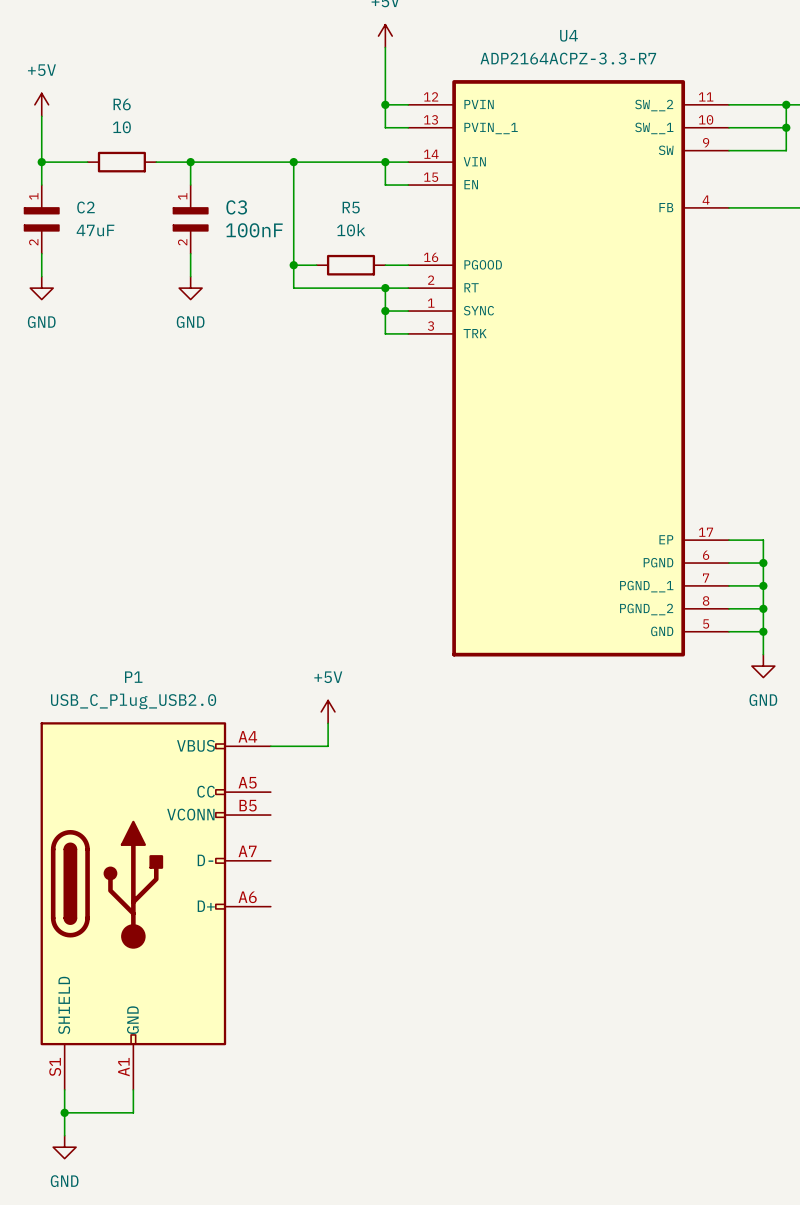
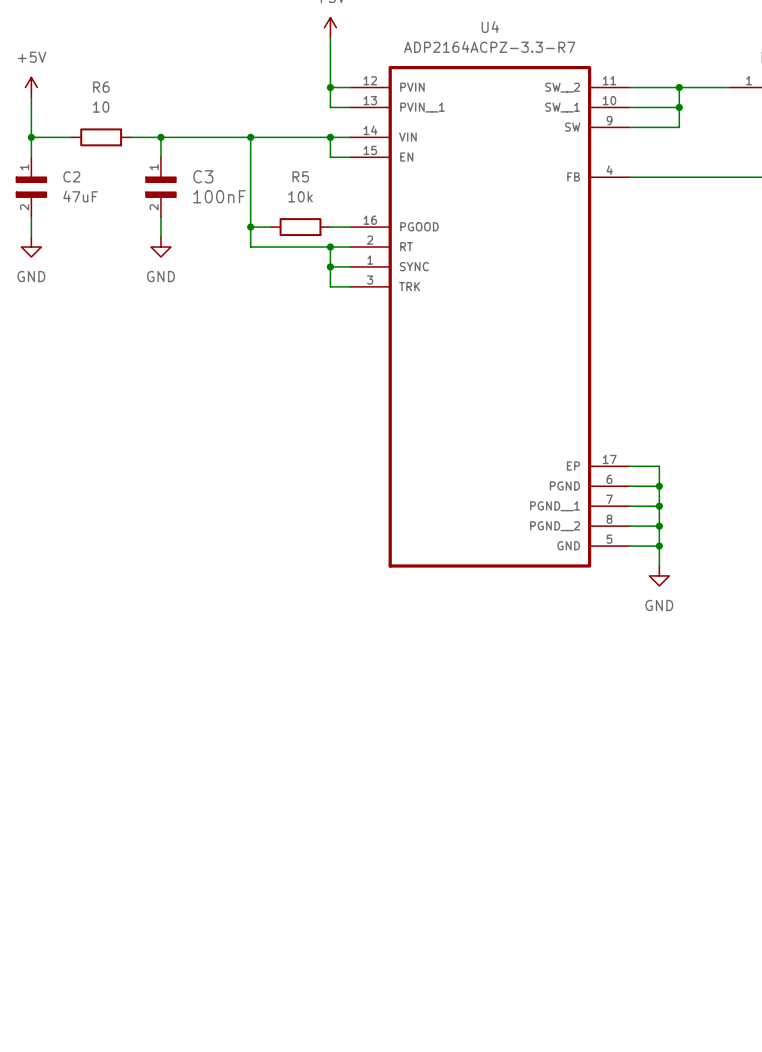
power symbol: +5V (328, 711) -> none
wire: (328, 723) (328, 746) (270, 746) -> none
P1: USB_C_Plug_USB2.0 (155, 906) -> none
wire: (64, 1089) (64, 1135) -> none
wire: (133, 1089) (133, 1112) (64, 1112) -> none
junction: (64, 1112) -> none
power symbol: GND (64, 1147) -> none

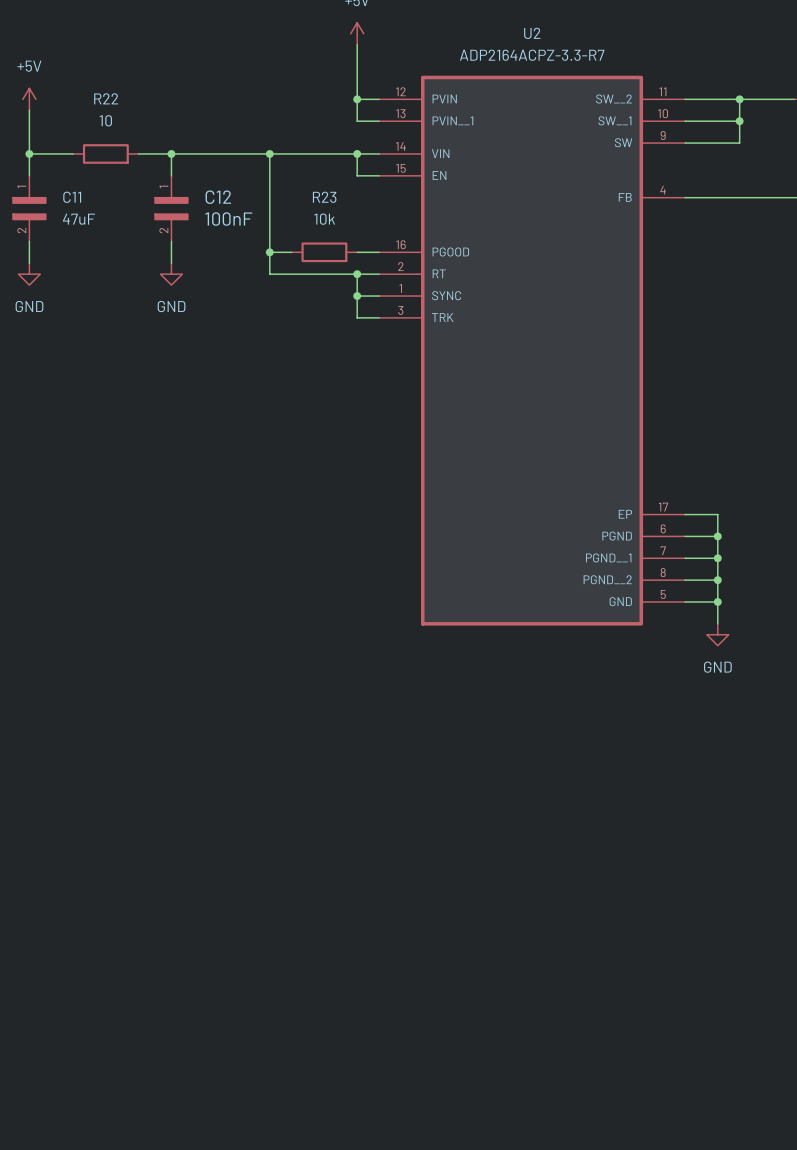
U4 name: U4 (490, 27) -> U2 (532, 33)
R6 name: R6 (101, 87) -> R22 (106, 98)
C2 name: C2 (71, 176) -> C11 (72, 197)
C3 name: C3 (203, 176) -> C12 (218, 197)
R5 name: R5 (300, 176) -> R23 (324, 197)

